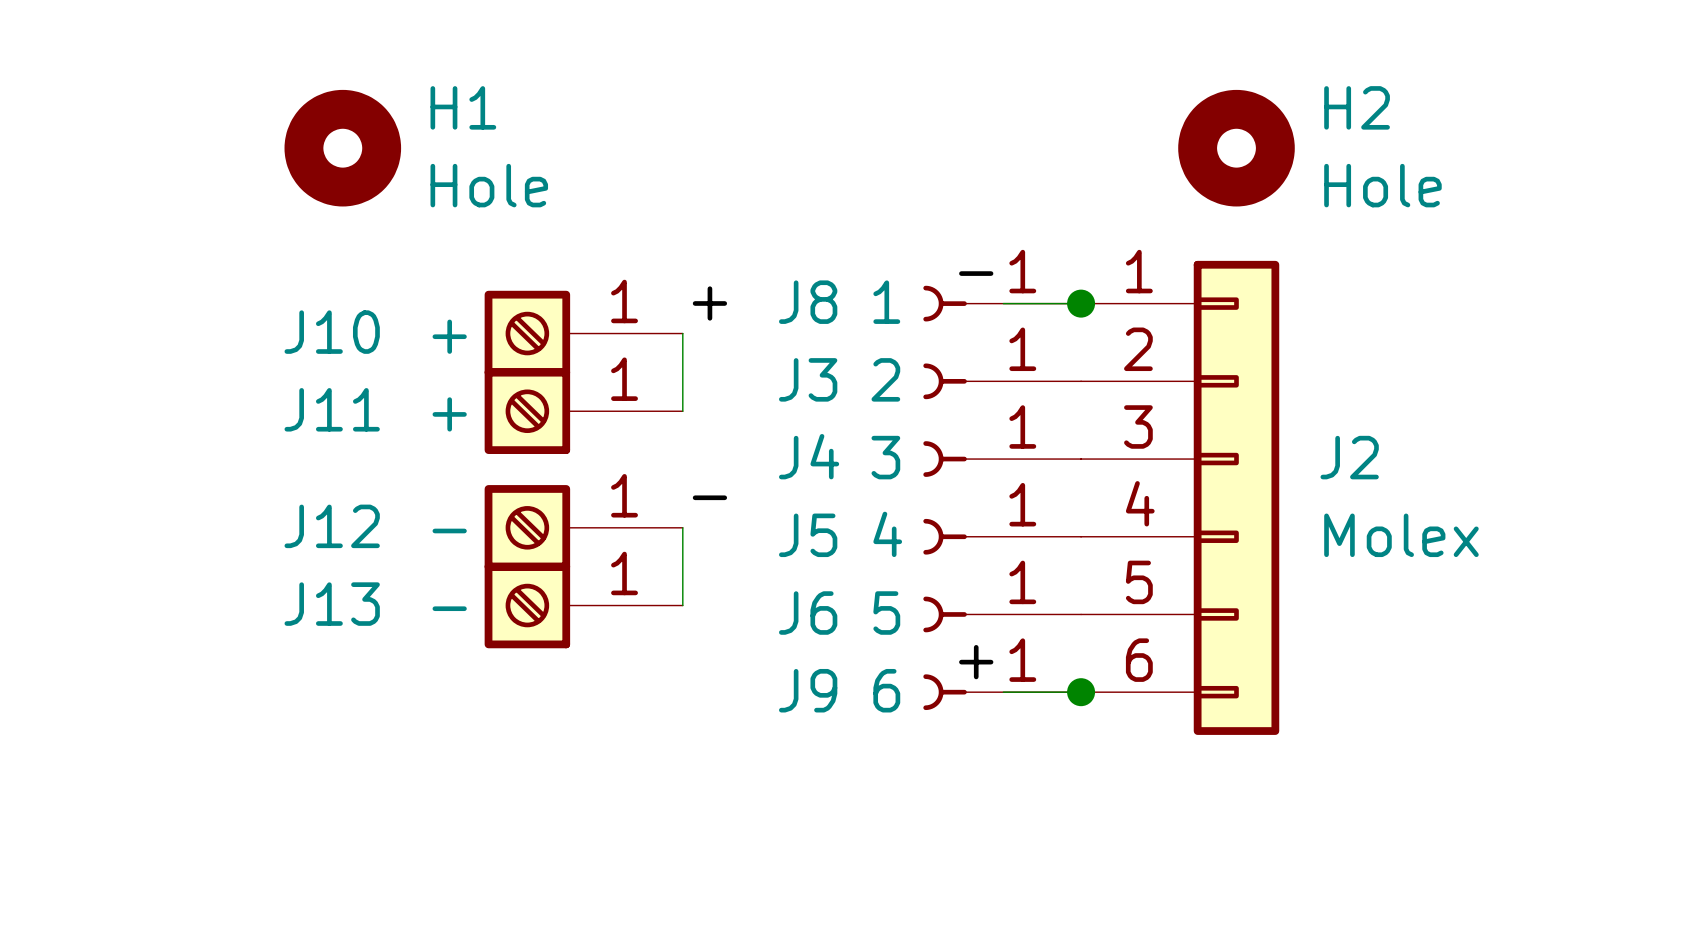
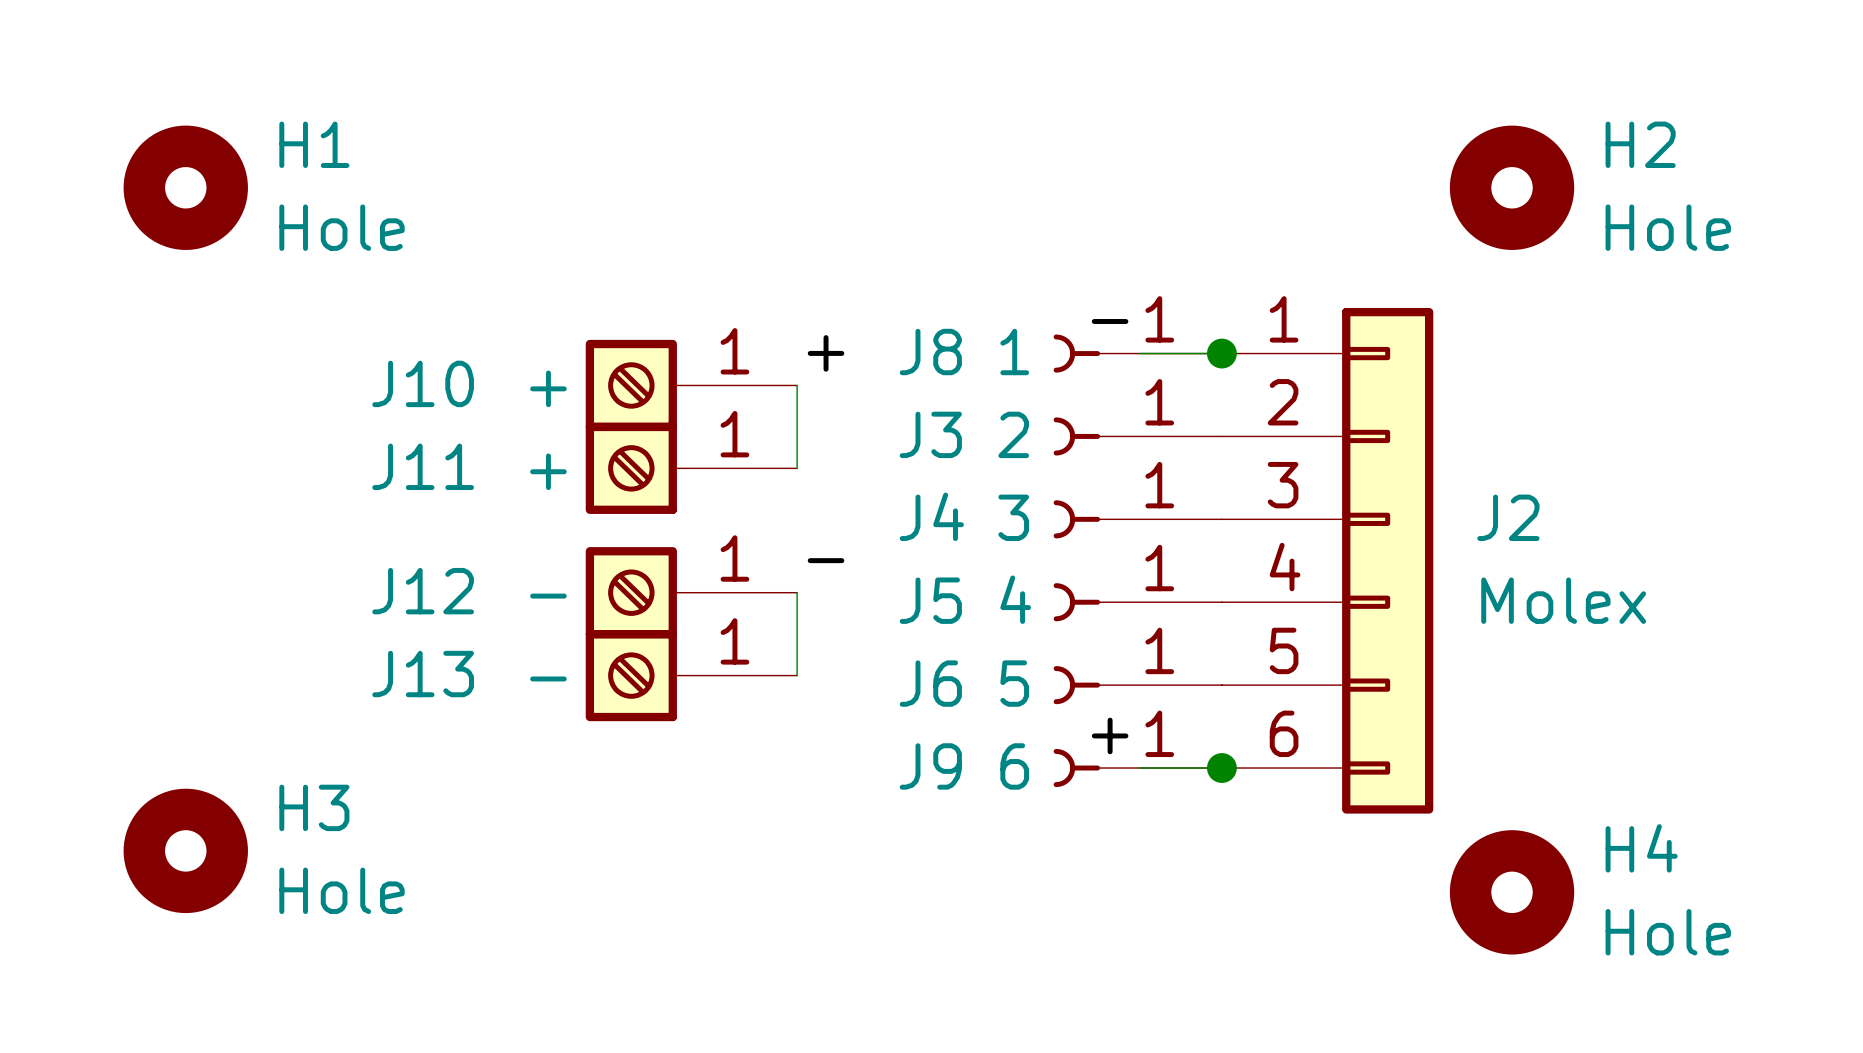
H1 position: (342, 148) -> (185, 187)
H2 position: (1236, 148) -> (1512, 187)
H3: none -> Hole (185, 850)
H4: none -> Hole (1512, 892)

